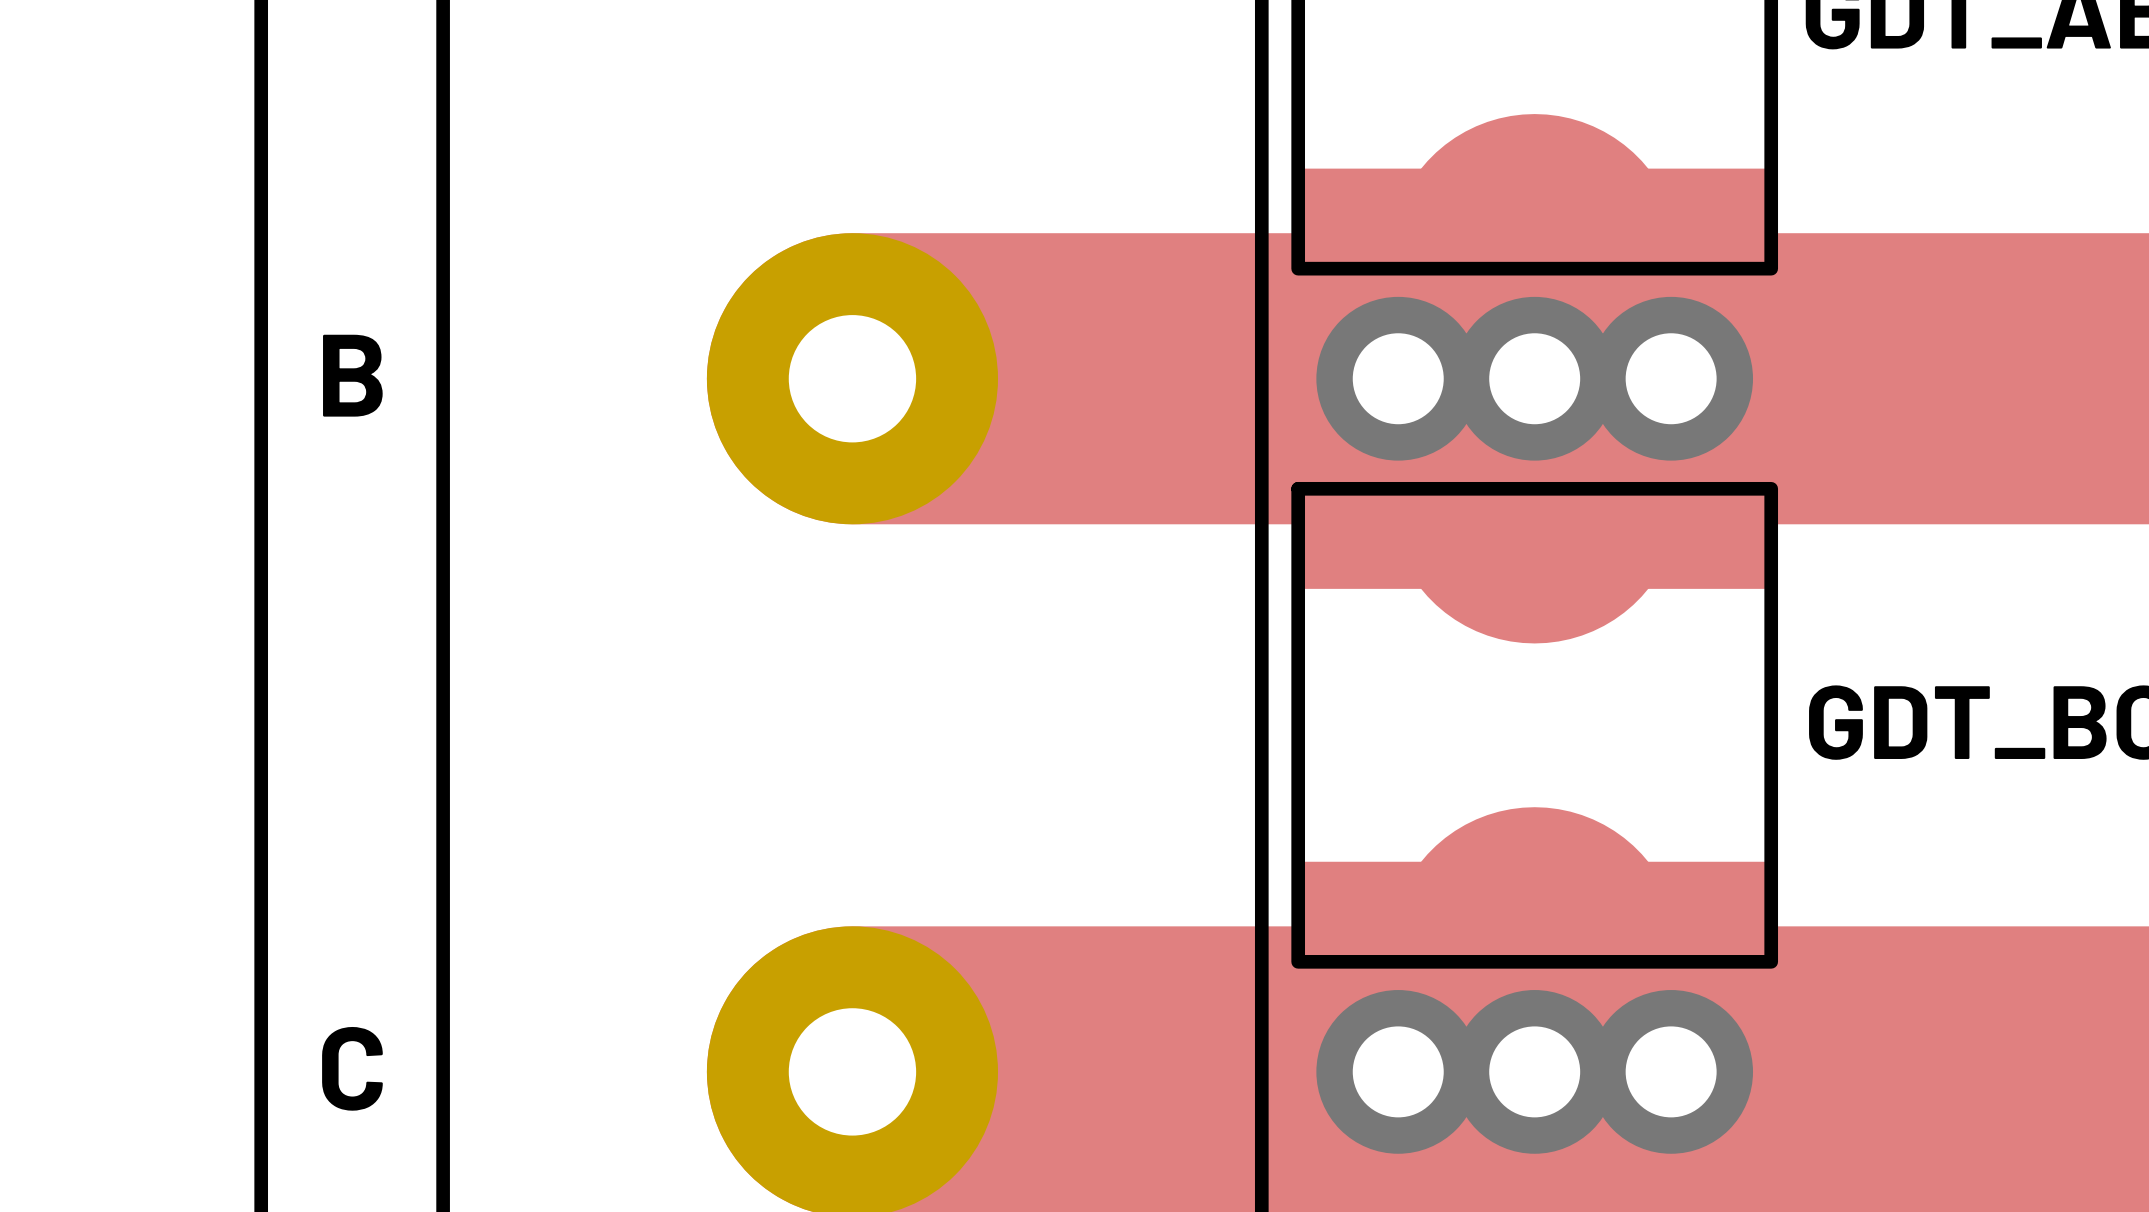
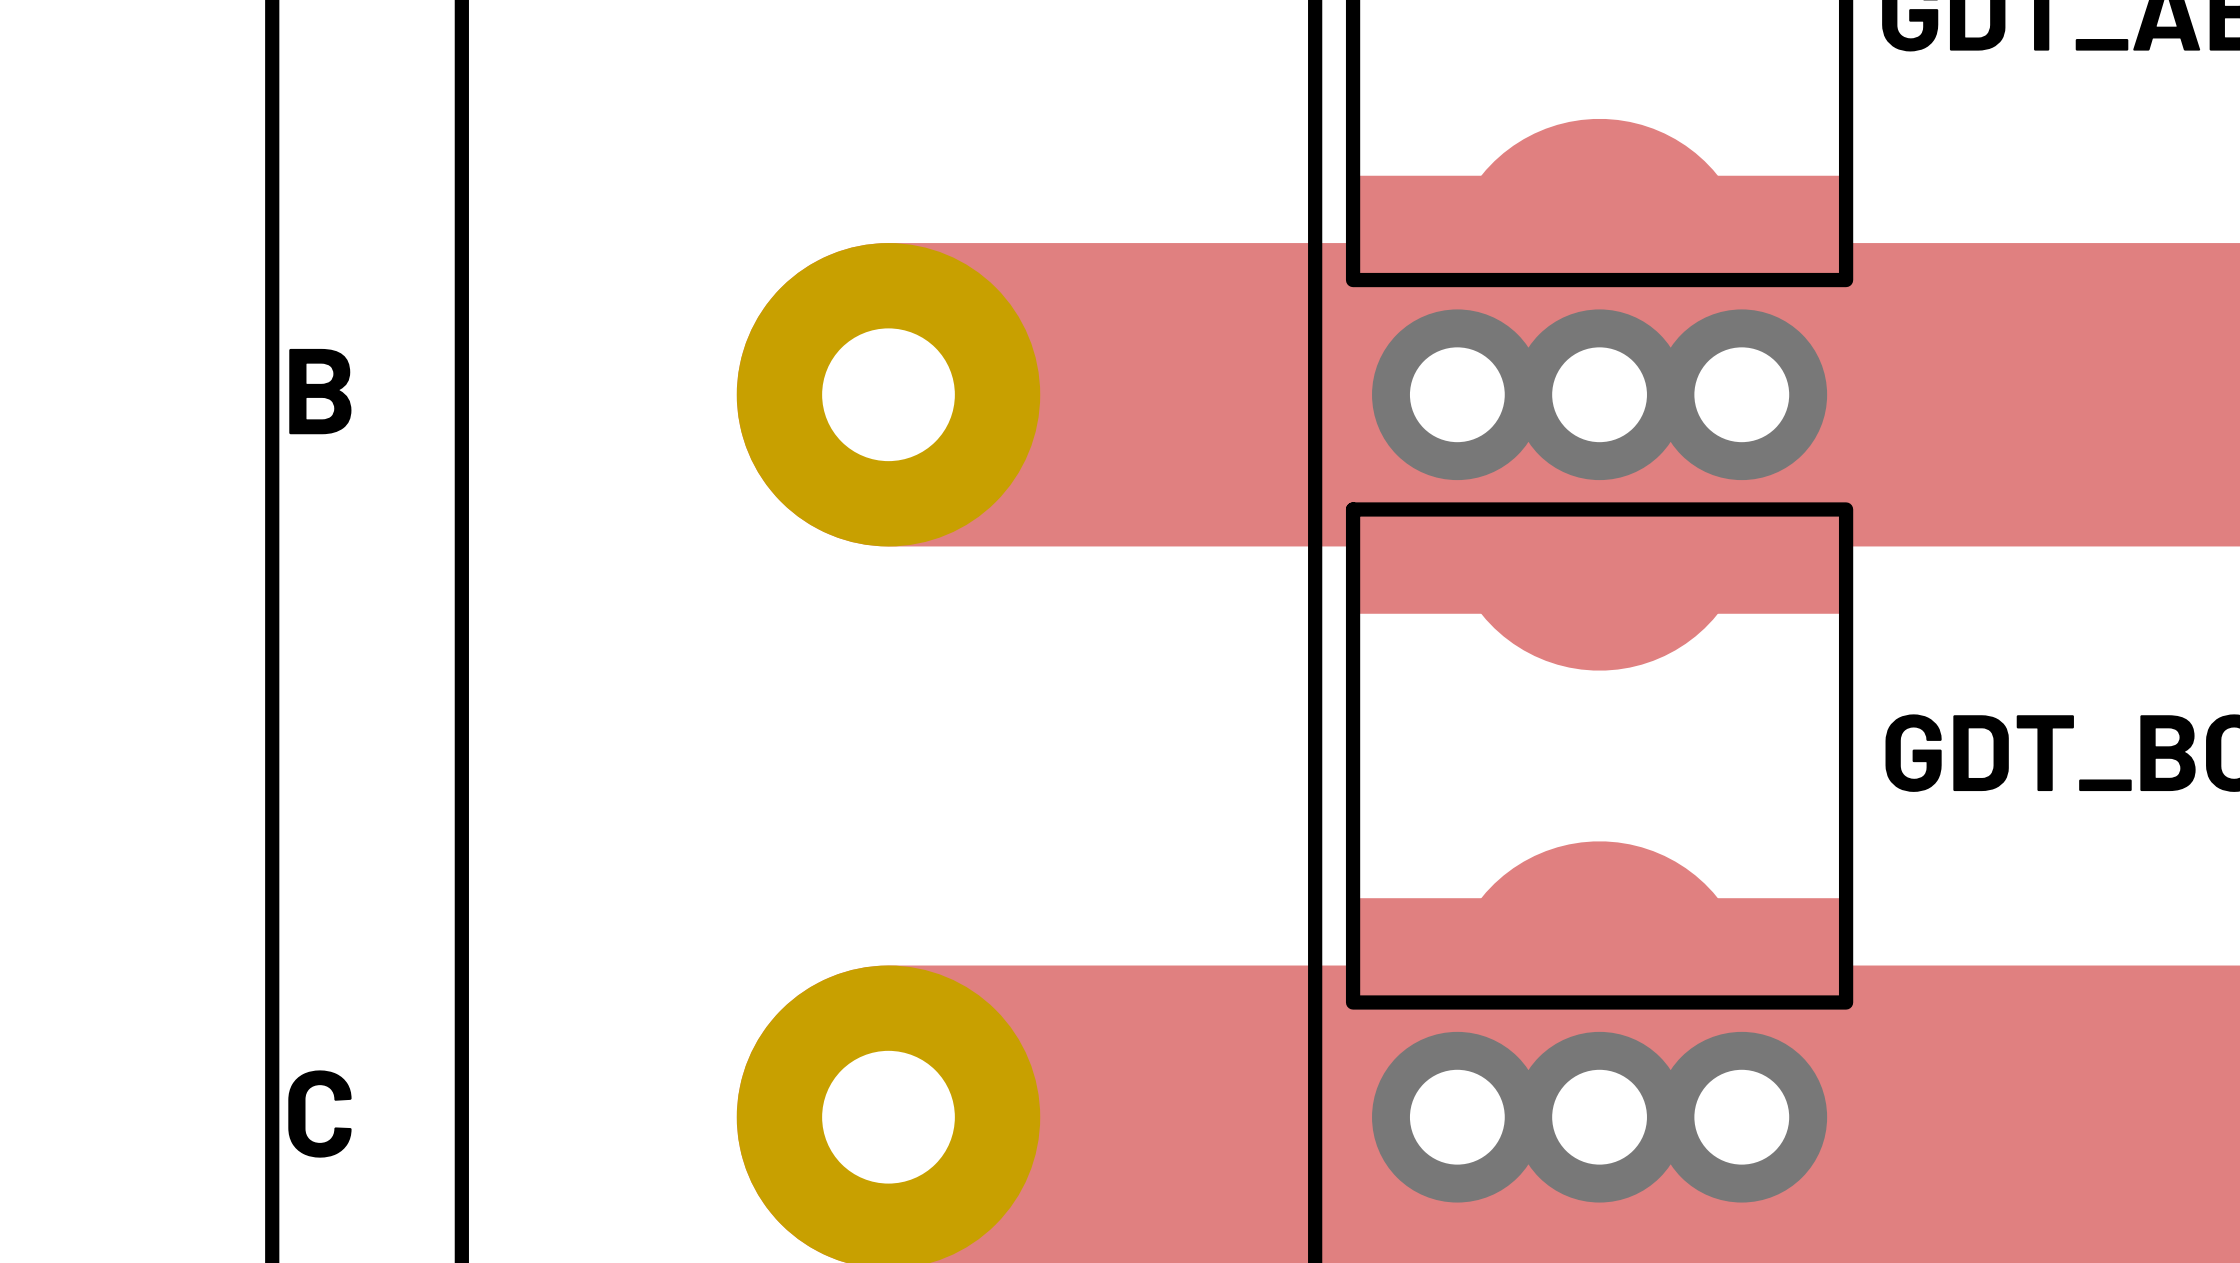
part text position: B (352, 375) -> B (320, 391)
part text position: C (352, 1068) -> C (319, 1114)

